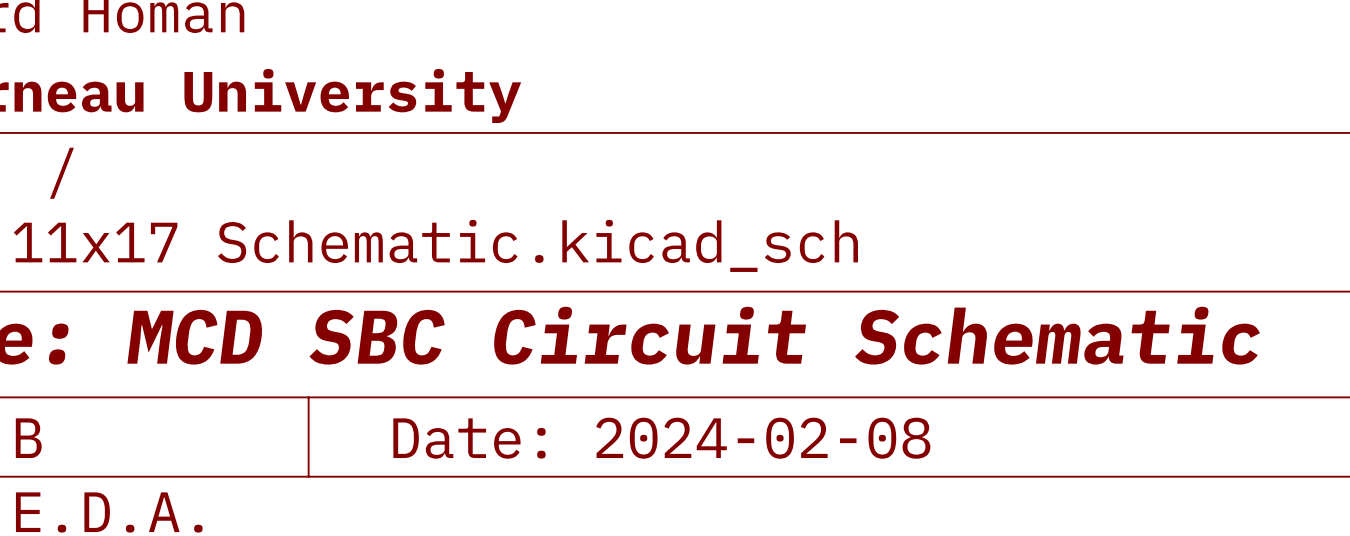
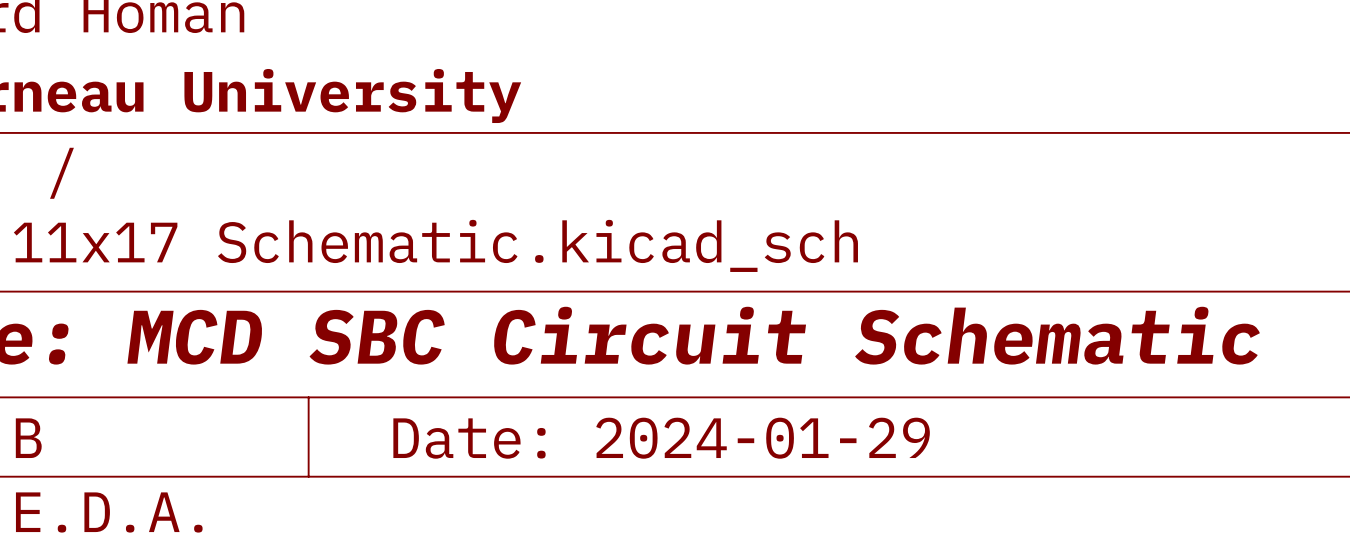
title block: Date: 2024-02-08 (661, 438) -> Date: 2024-01-29 (661, 438)

